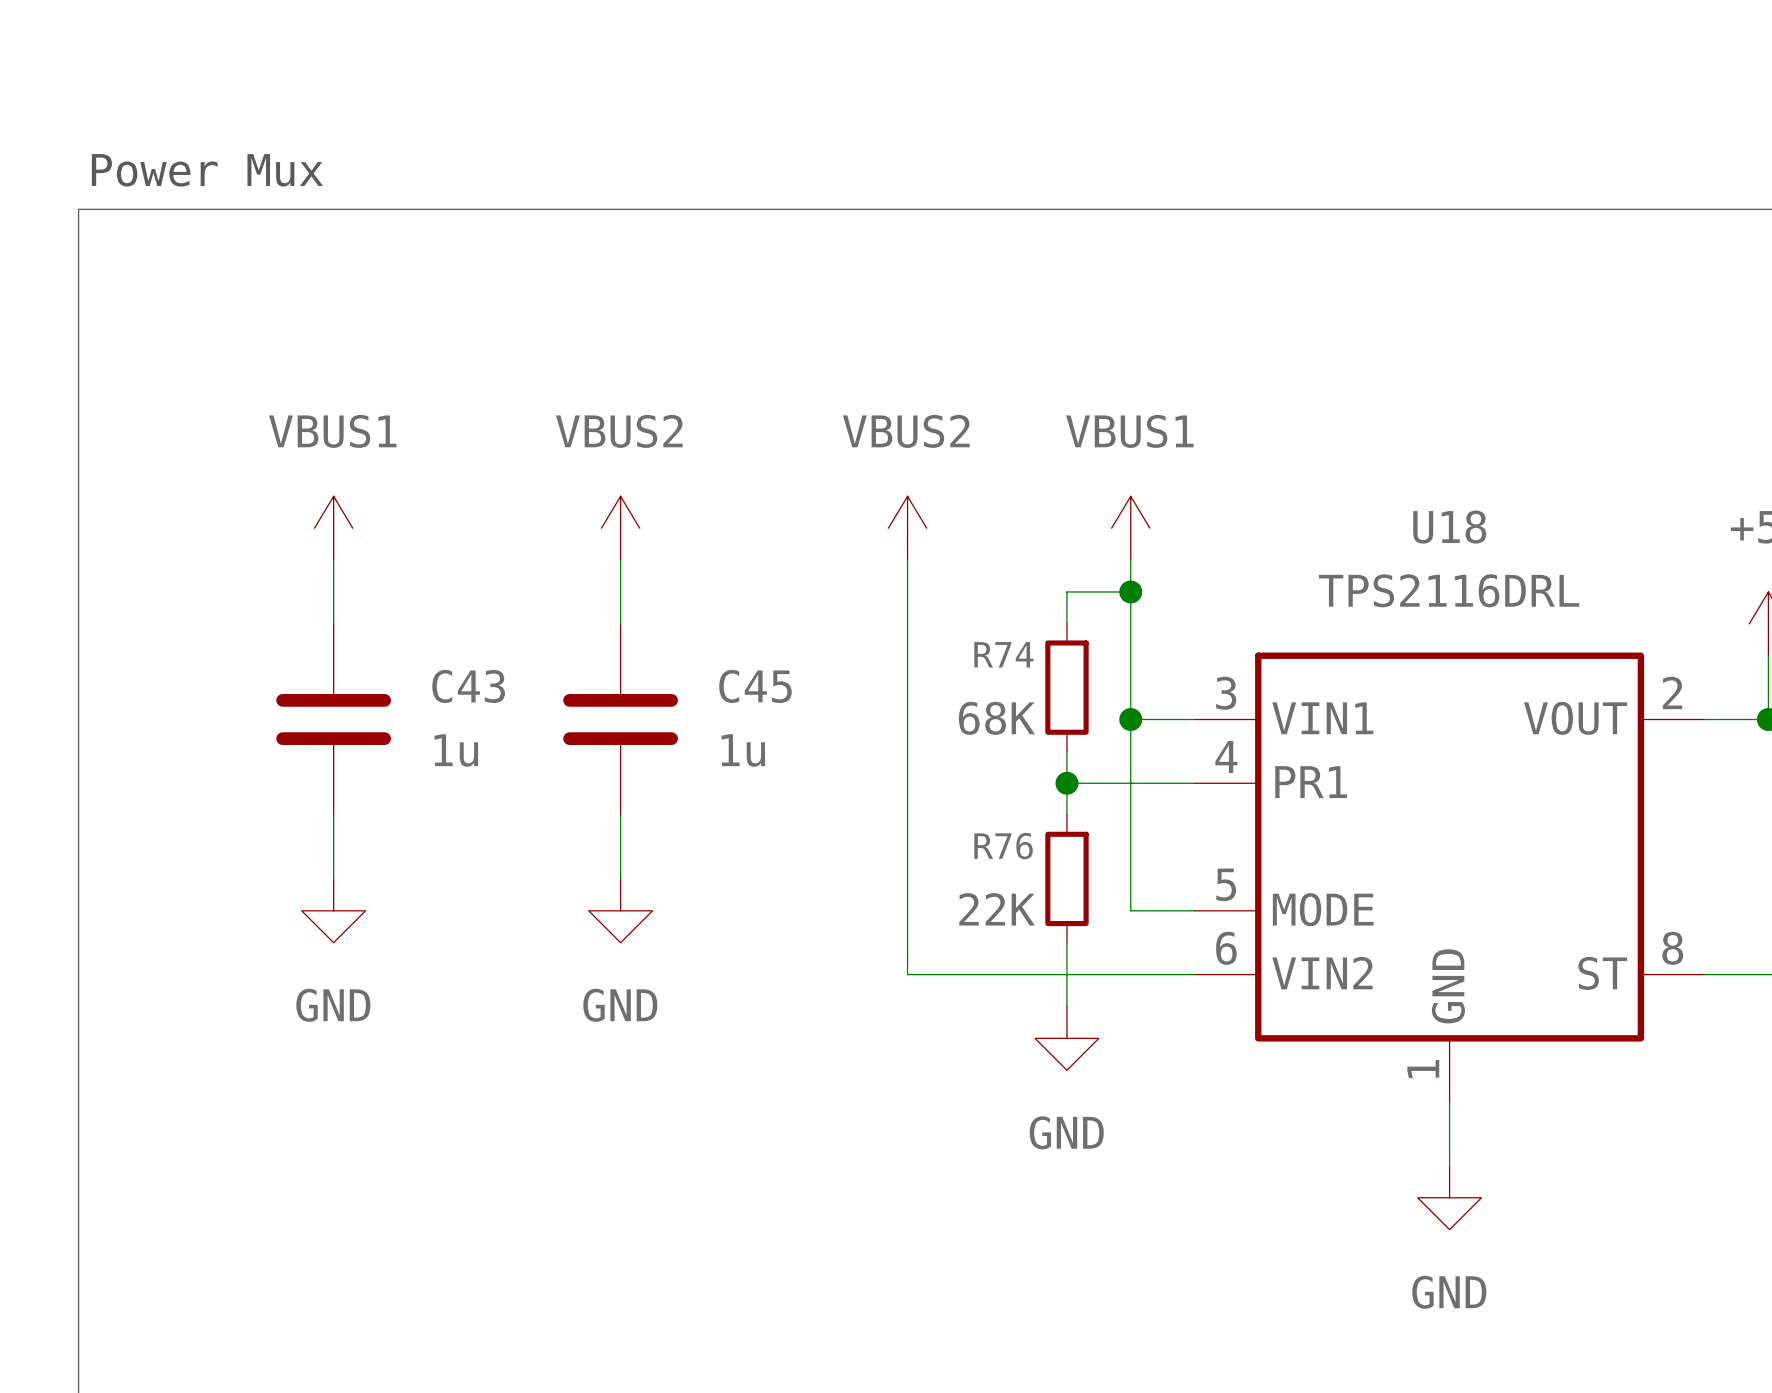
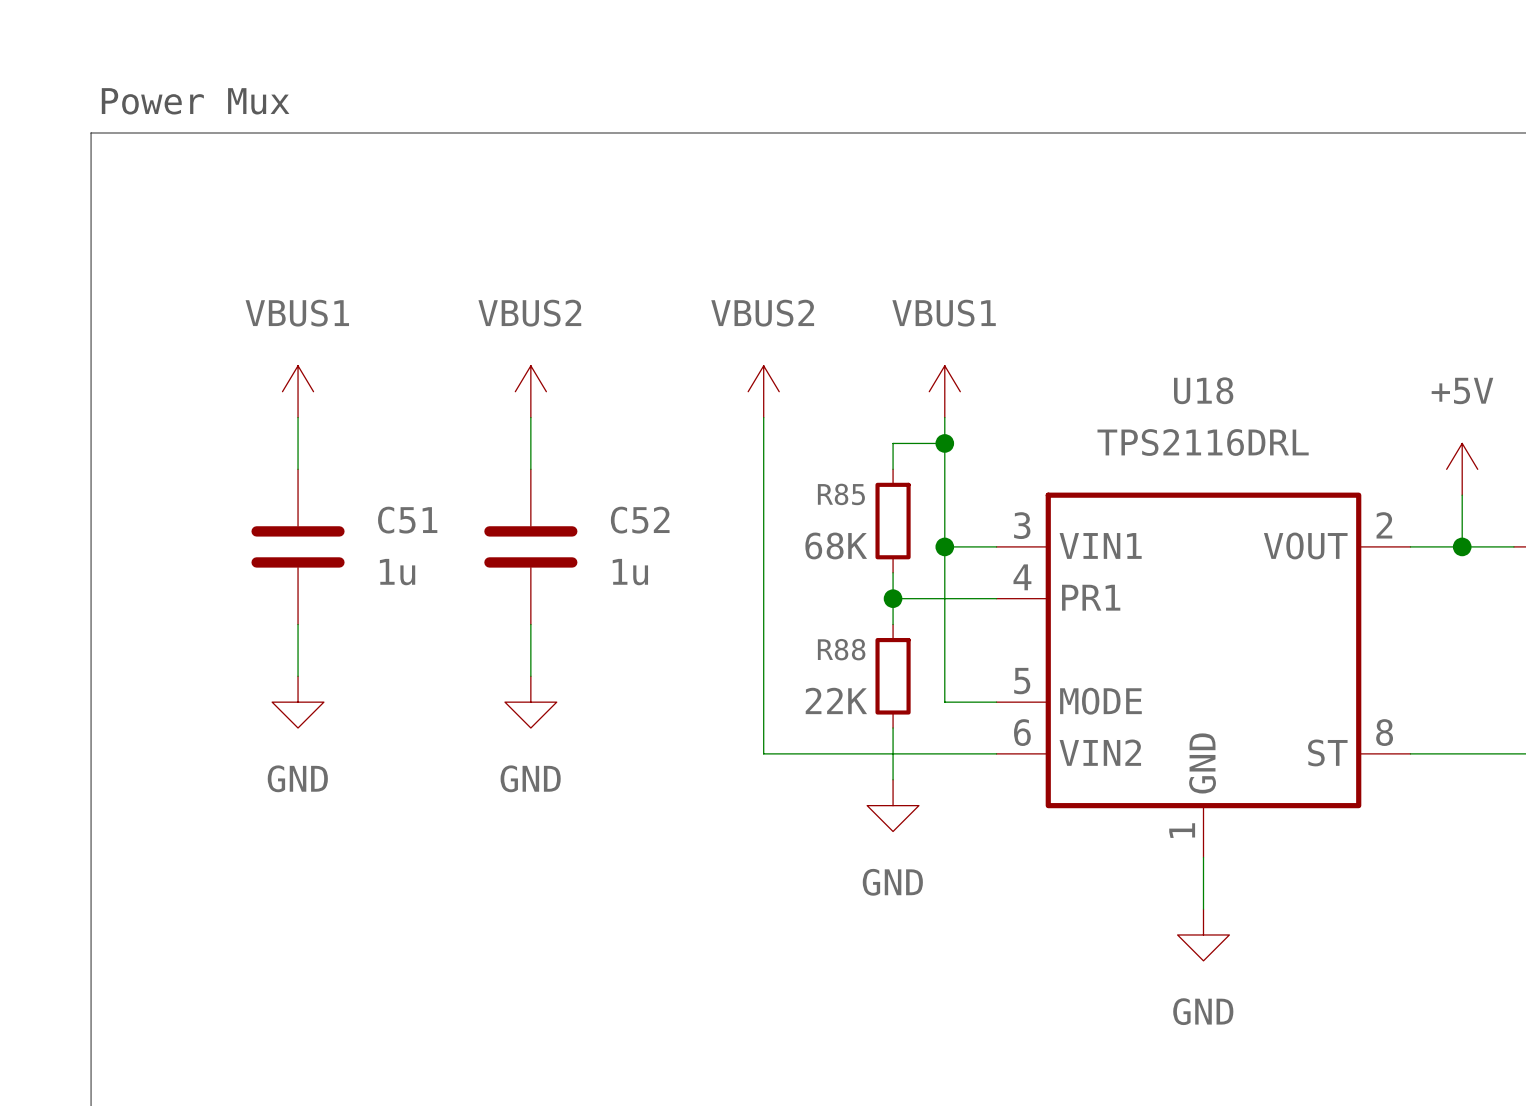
R74 name: R74 (1003, 654) -> R85 (841, 494)
C43 name: C43 (468, 686) -> C51 (407, 520)
C45 name: C45 (755, 686) -> C52 (640, 520)
R76 name: R76 (1003, 846) -> R88 (841, 649)

